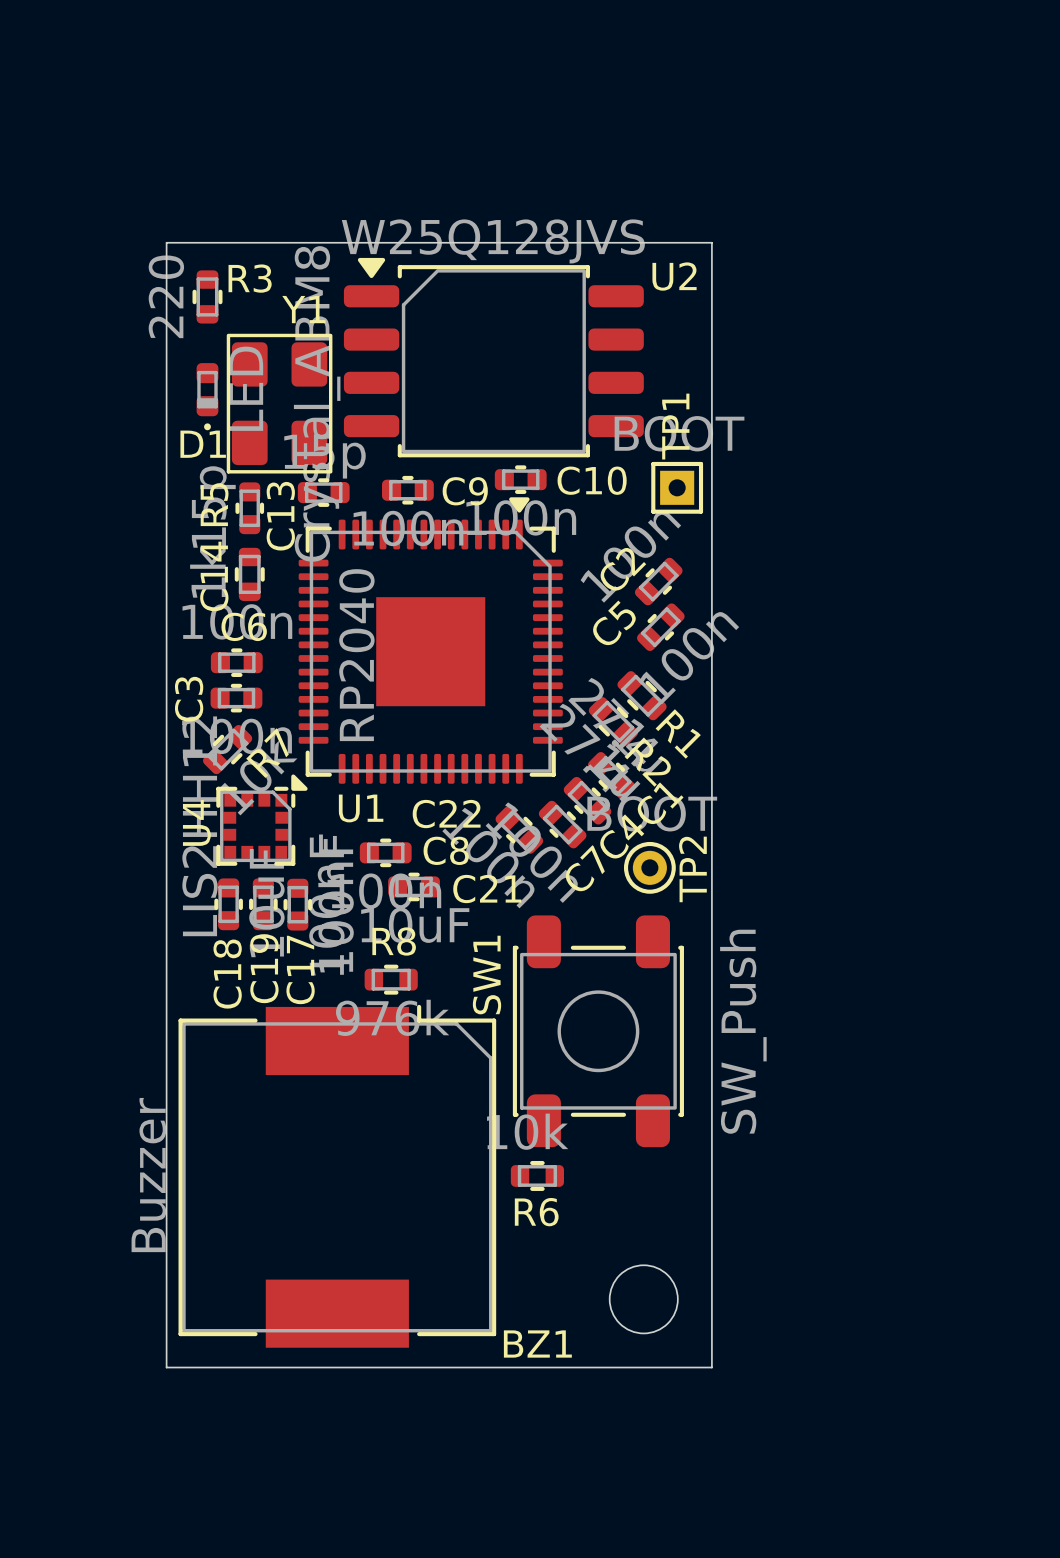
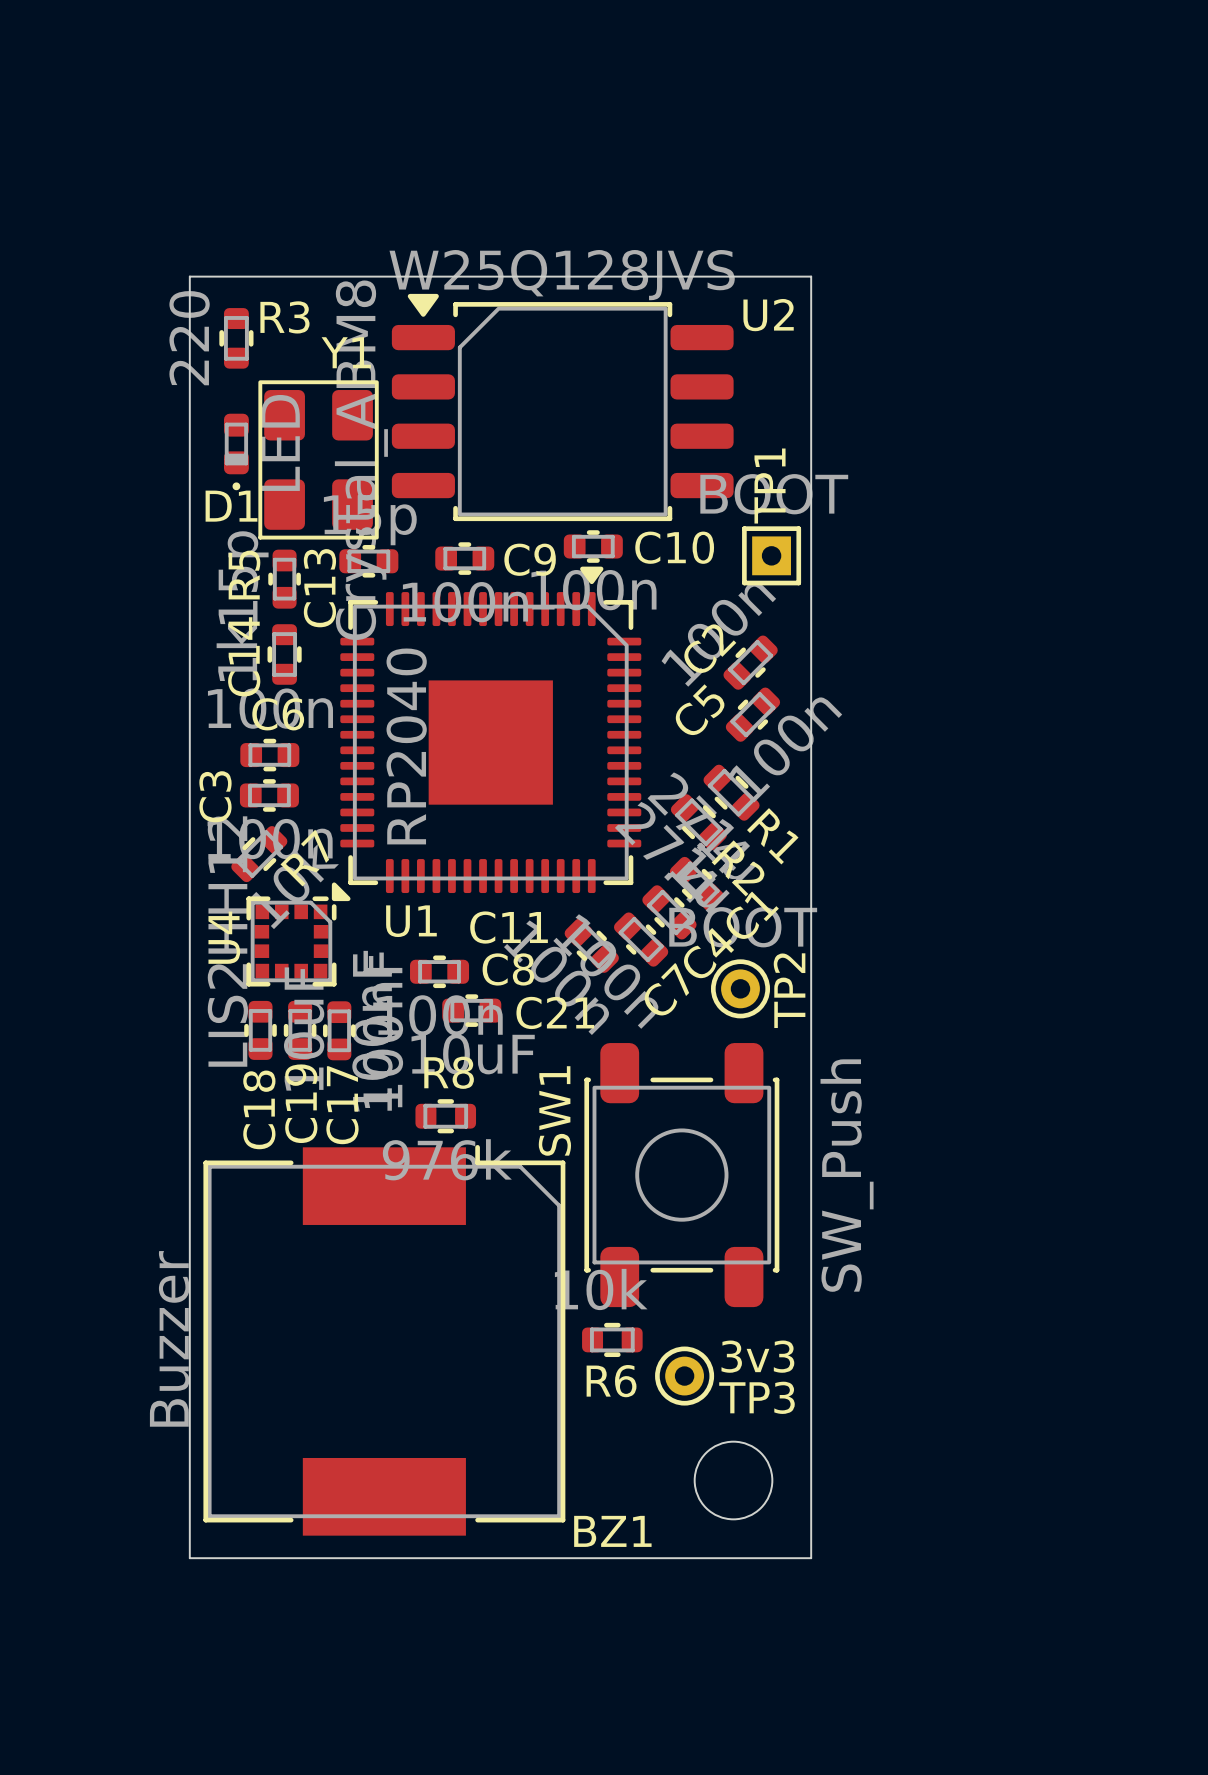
C22 name: C22 (446, 814) -> C11 (509, 927)
TP3: none -> 3v3 (684, 1376)

